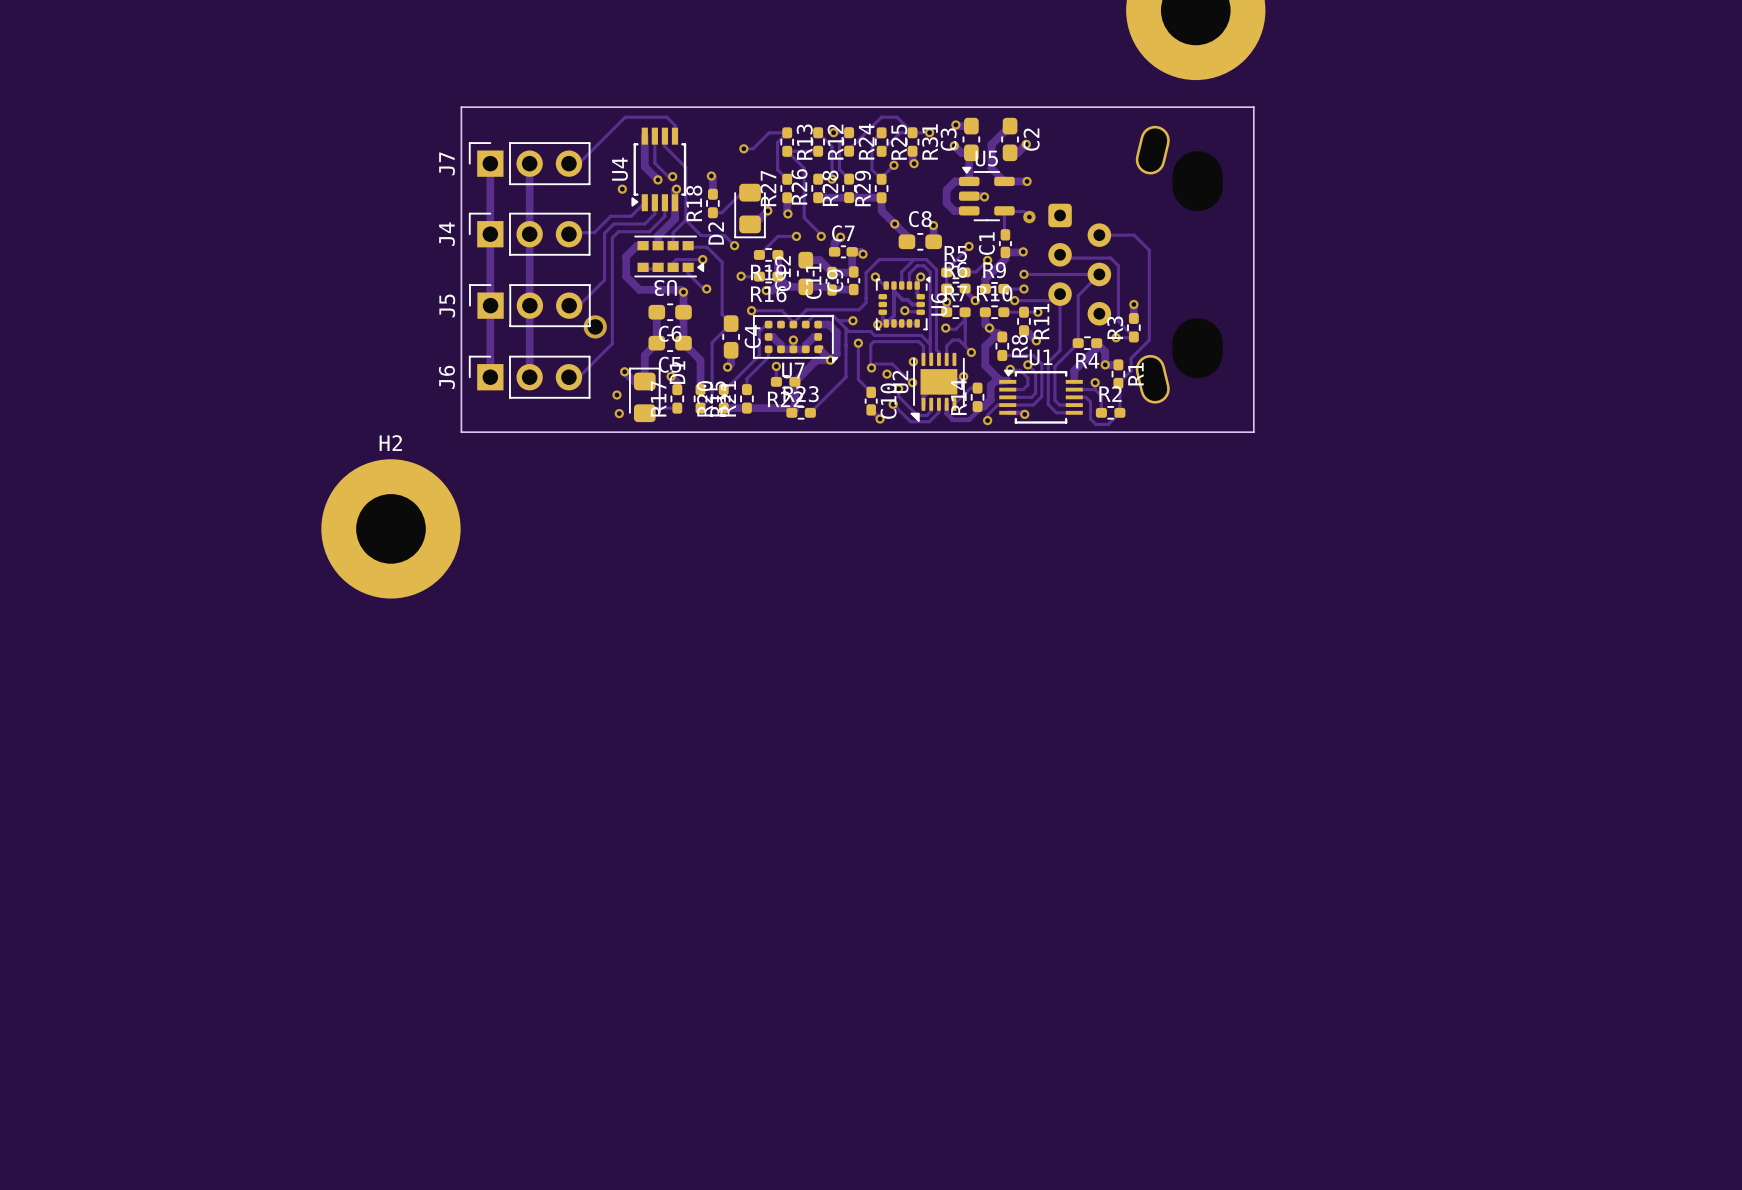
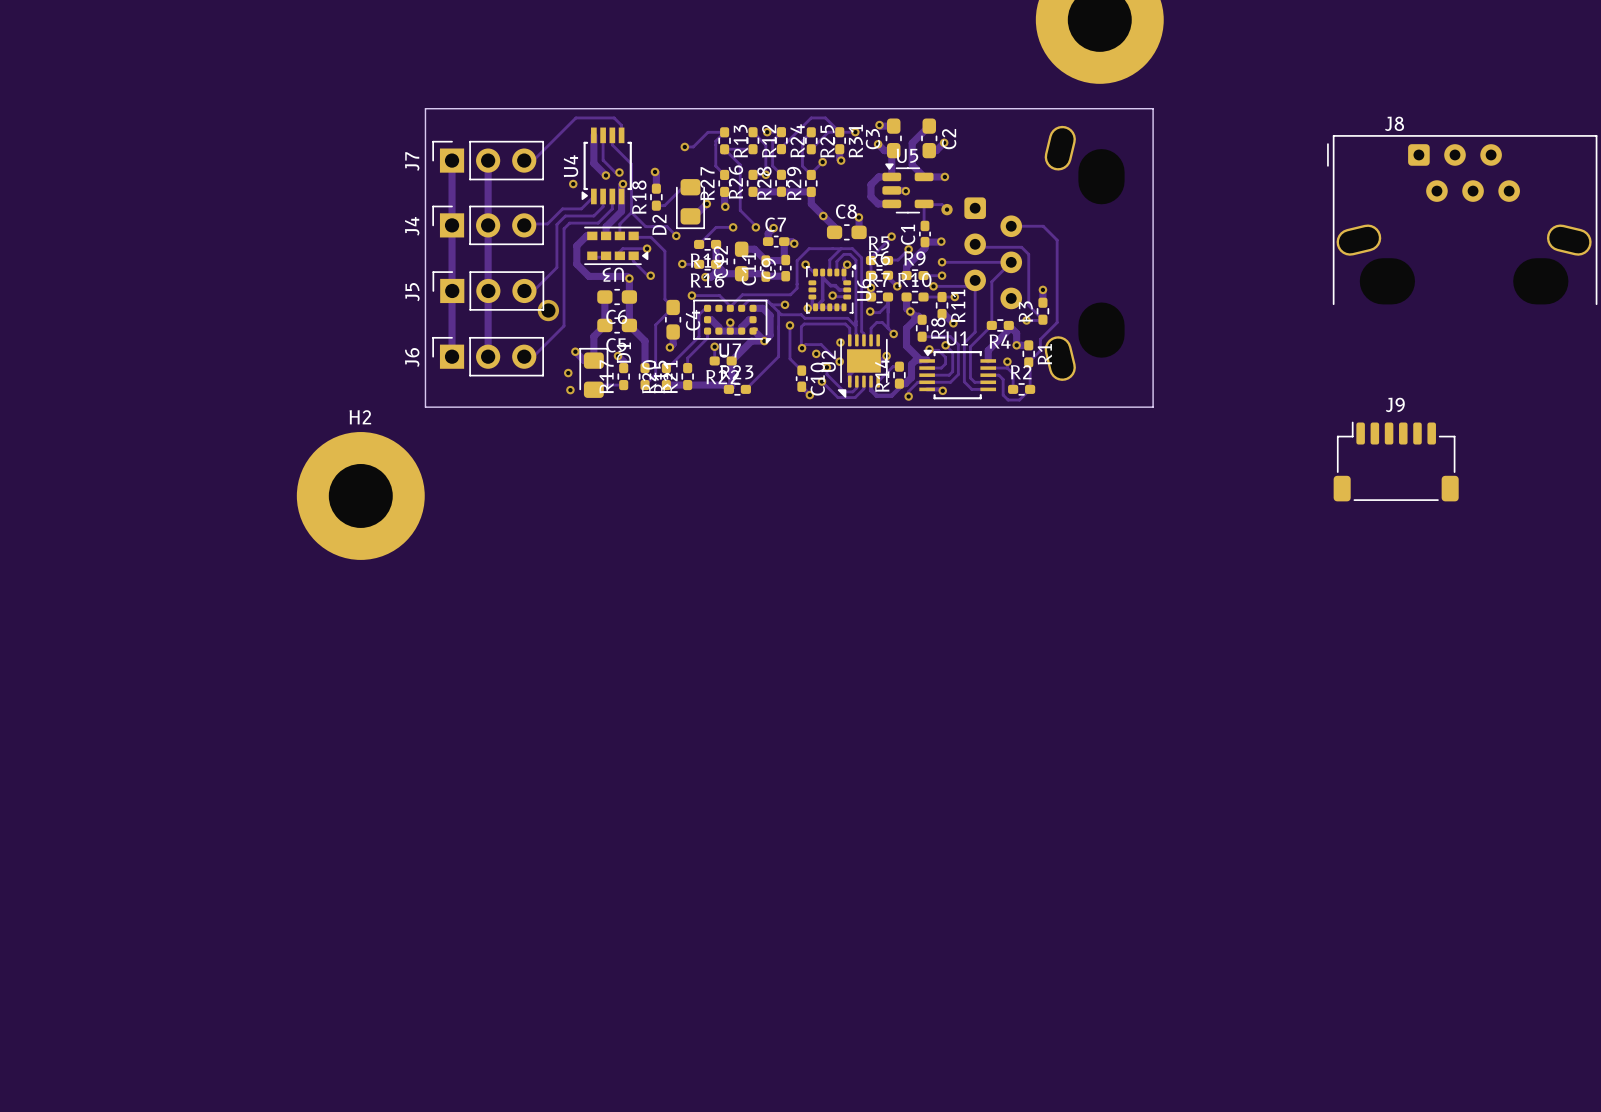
J8: none -> (1462, 220)
J9: none -> (1396, 461)

